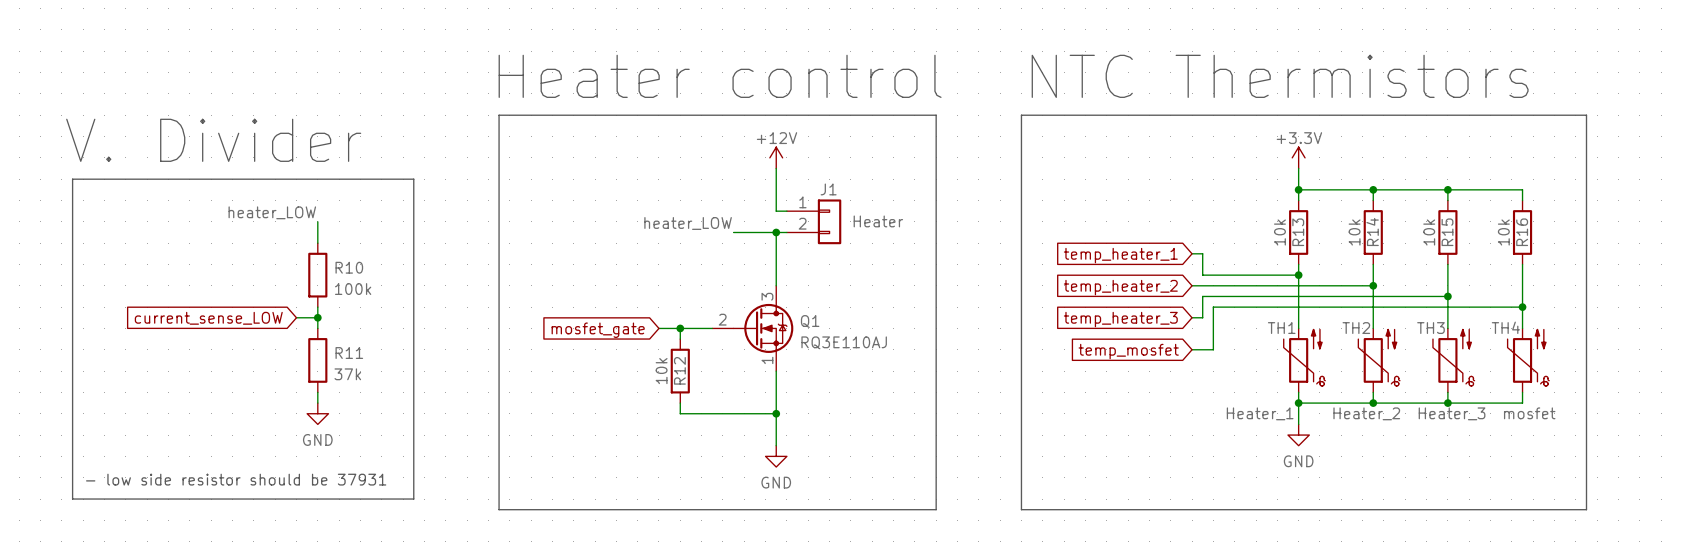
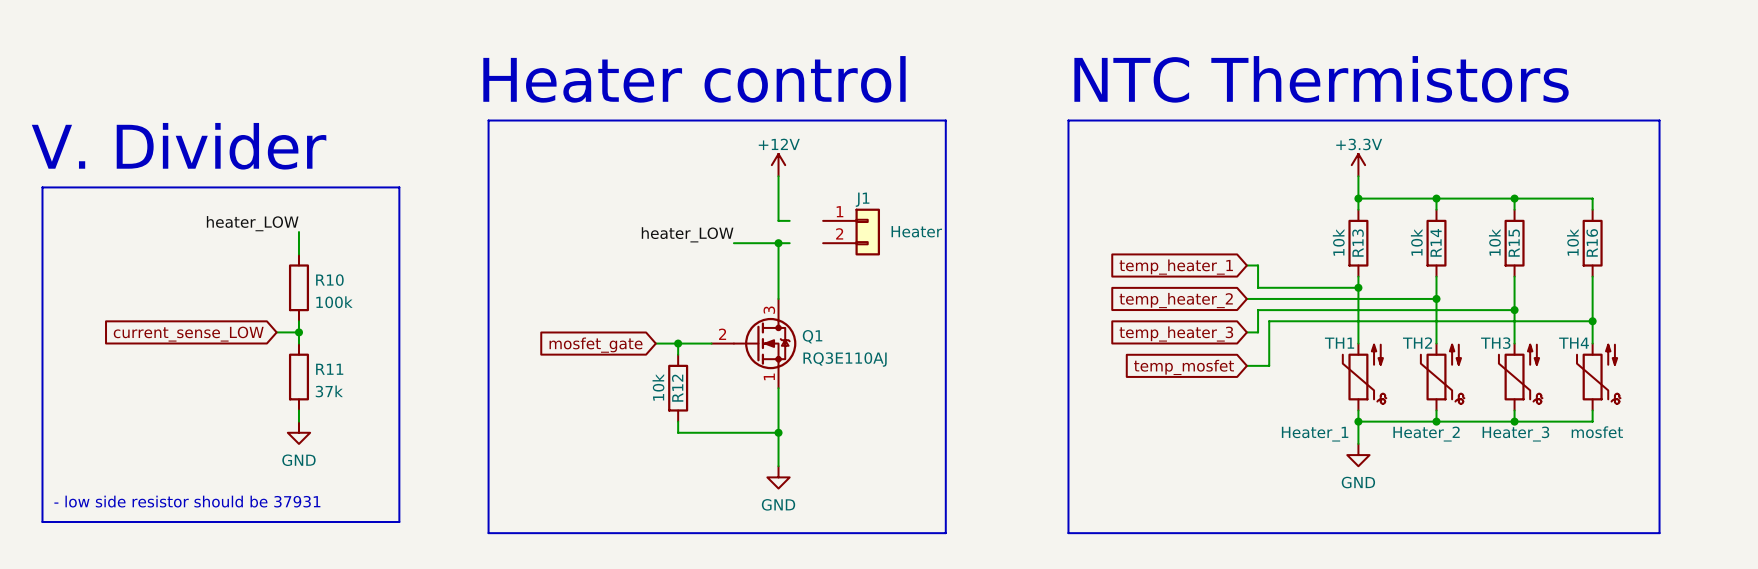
text position: Heater control (720, 76) -> Heater control (694, 79)
line: (499, 115) (499, 509) -> (522, 120) (488, 120) (488, 533) (522, 533)
line: (904, 115) (936, 115) (936, 509) (904, 509) -> (945, 120) (945, 533)
text position: V. Divider (213, 140) -> V. Divider (179, 146)
power symbol position: +12V (776, 157) -> +12V (778, 165)
wire: (776, 168) (776, 211) (786, 211) -> (778, 176) (778, 220) (789, 220)
line: (72, 179) (72, 499) -> (75, 187) (42, 187) (42, 521) (75, 521)
line: (381, 179) (413, 179) (413, 499) (381, 499) -> (399, 187) (399, 521)
label position: heater_LOW (272, 212) -> heater_LOW (252, 223)
wire: (317, 221) (317, 243) -> (298, 232) (298, 254)
label position: heater_LOW (688, 223) -> heater_LOW (687, 234)
wire: (754, 232) (786, 232) -> (733, 243) (767, 243)
wire: (776, 232) (776, 285) -> (778, 243) (778, 298)
junction position: (776, 232) -> (778, 243)
R10 position: (317, 275) -> (298, 287)
wire: (317, 307) (317, 328) -> (298, 321) (298, 343)
wire: (296, 317) (317, 317) -> (276, 332) (298, 332)
junction position: (317, 317) -> (298, 332)
global label position: current_sense_LOW (208, 318) -> current_sense_LOW (188, 334)
wire: none -> (678, 343) (678, 354)
junction position: (680, 328) -> (678, 343)
Q1 position: (752, 328) -> (753, 343)
global label position: mosfet_gate (598, 330) -> mosfet_gate (596, 345)
R11 position: (317, 360) -> (298, 377)
R12 position: (680, 371) -> (678, 388)
wire: (776, 371) (776, 445) -> (778, 388) (778, 466)
wire: (317, 392) (317, 403) -> (298, 410) (298, 421)
wire: (680, 403) (680, 413) -> (678, 421) (678, 432) (711, 432)
power symbol position: GND (317, 413) -> GND (298, 432)
wire: (744, 413) (776, 413) -> (655, 343) (689, 343)
junction position: (776, 413) -> (778, 432)
power symbol position: GND (776, 456) -> GND (778, 477)
text position: - low side resistor should be 37931 (236, 479) -> - low side resistor should be 37931 (187, 501)

